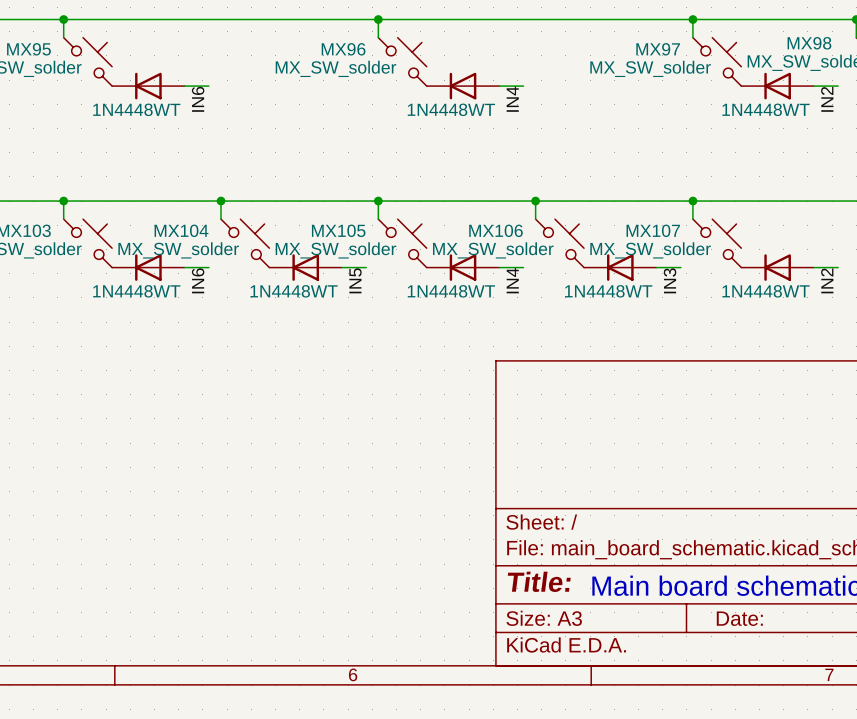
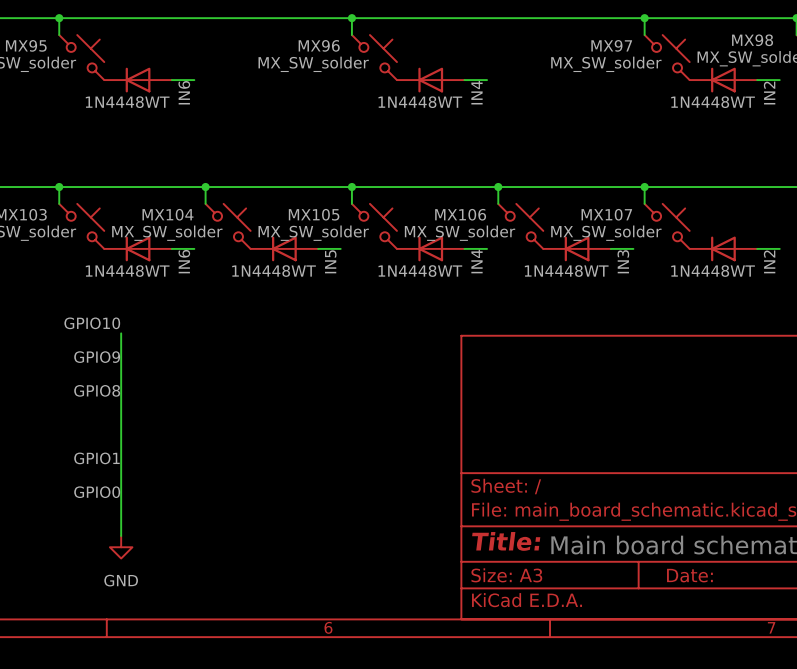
label: none -> GPIO10 (92, 323)
wire: none -> (121, 333) (121, 535)
label: none -> GPIO9 (97, 357)
label: none -> GPIO8 (97, 390)
label: none -> GPIO1 (96, 458)
label: none -> GPIO0 (97, 492)
power symbol: none -> GND (121, 547)

